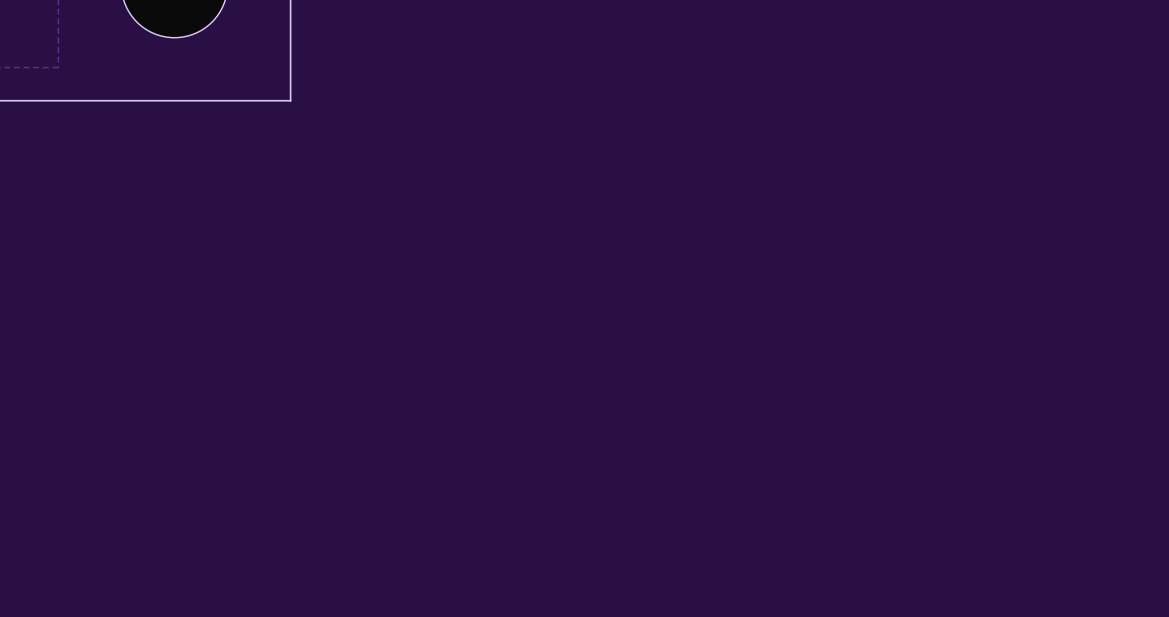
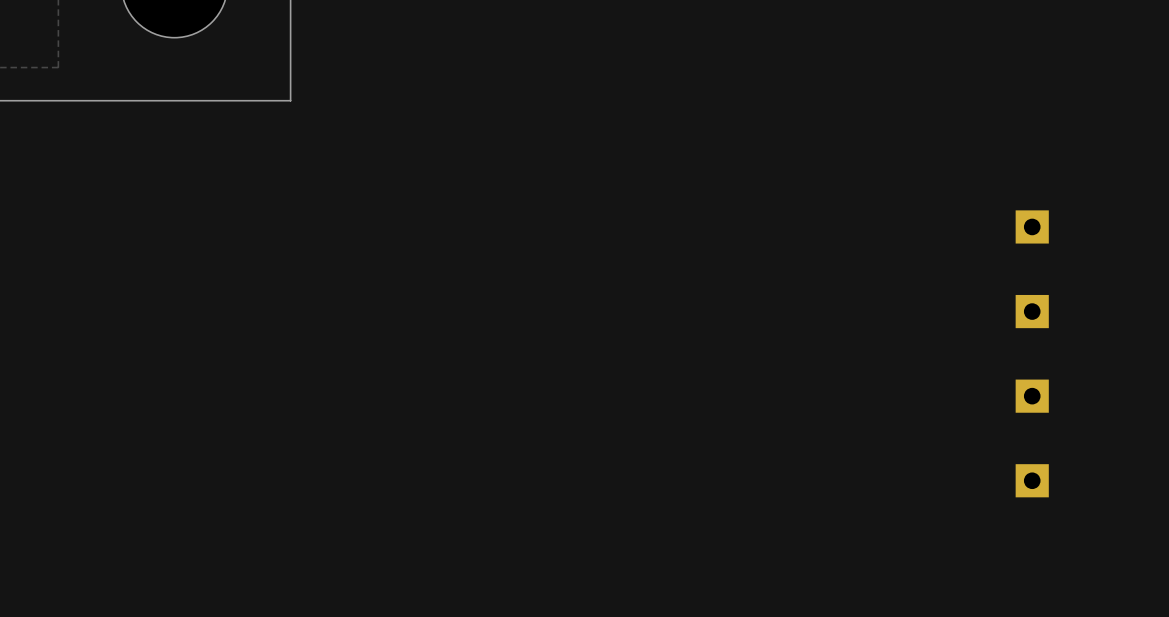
part: none -> (1032, 226)
part: none -> (1032, 311)
part: none -> (1032, 396)
part: none -> (1032, 480)

